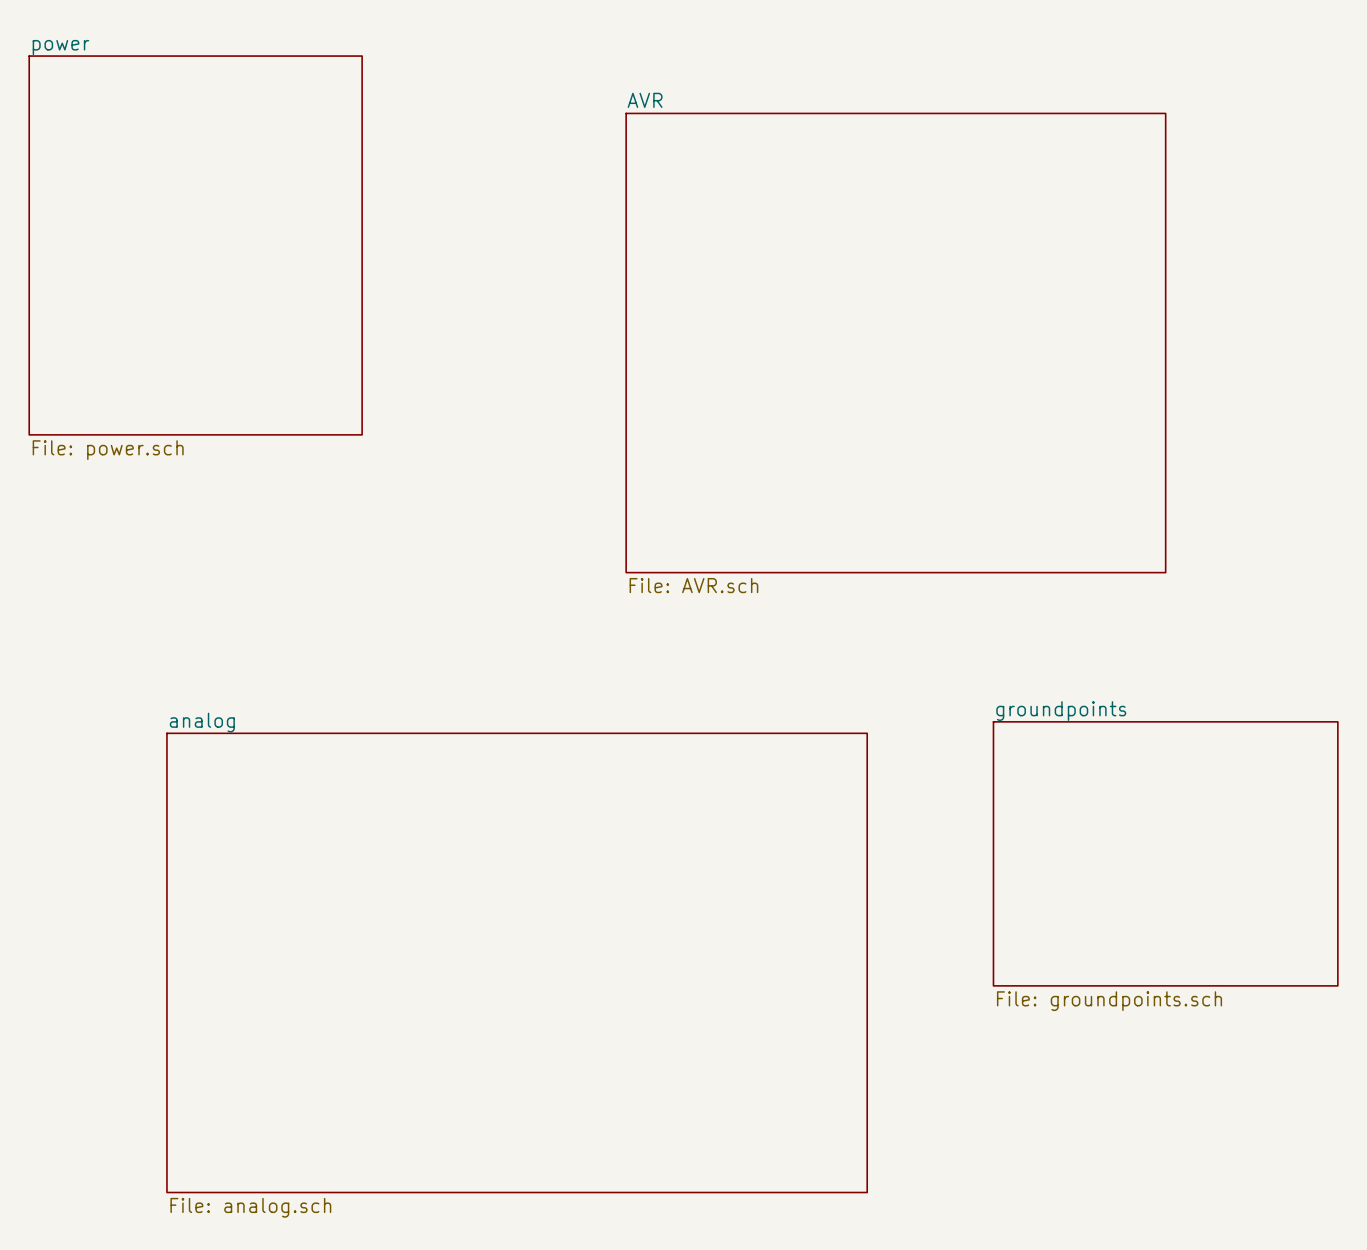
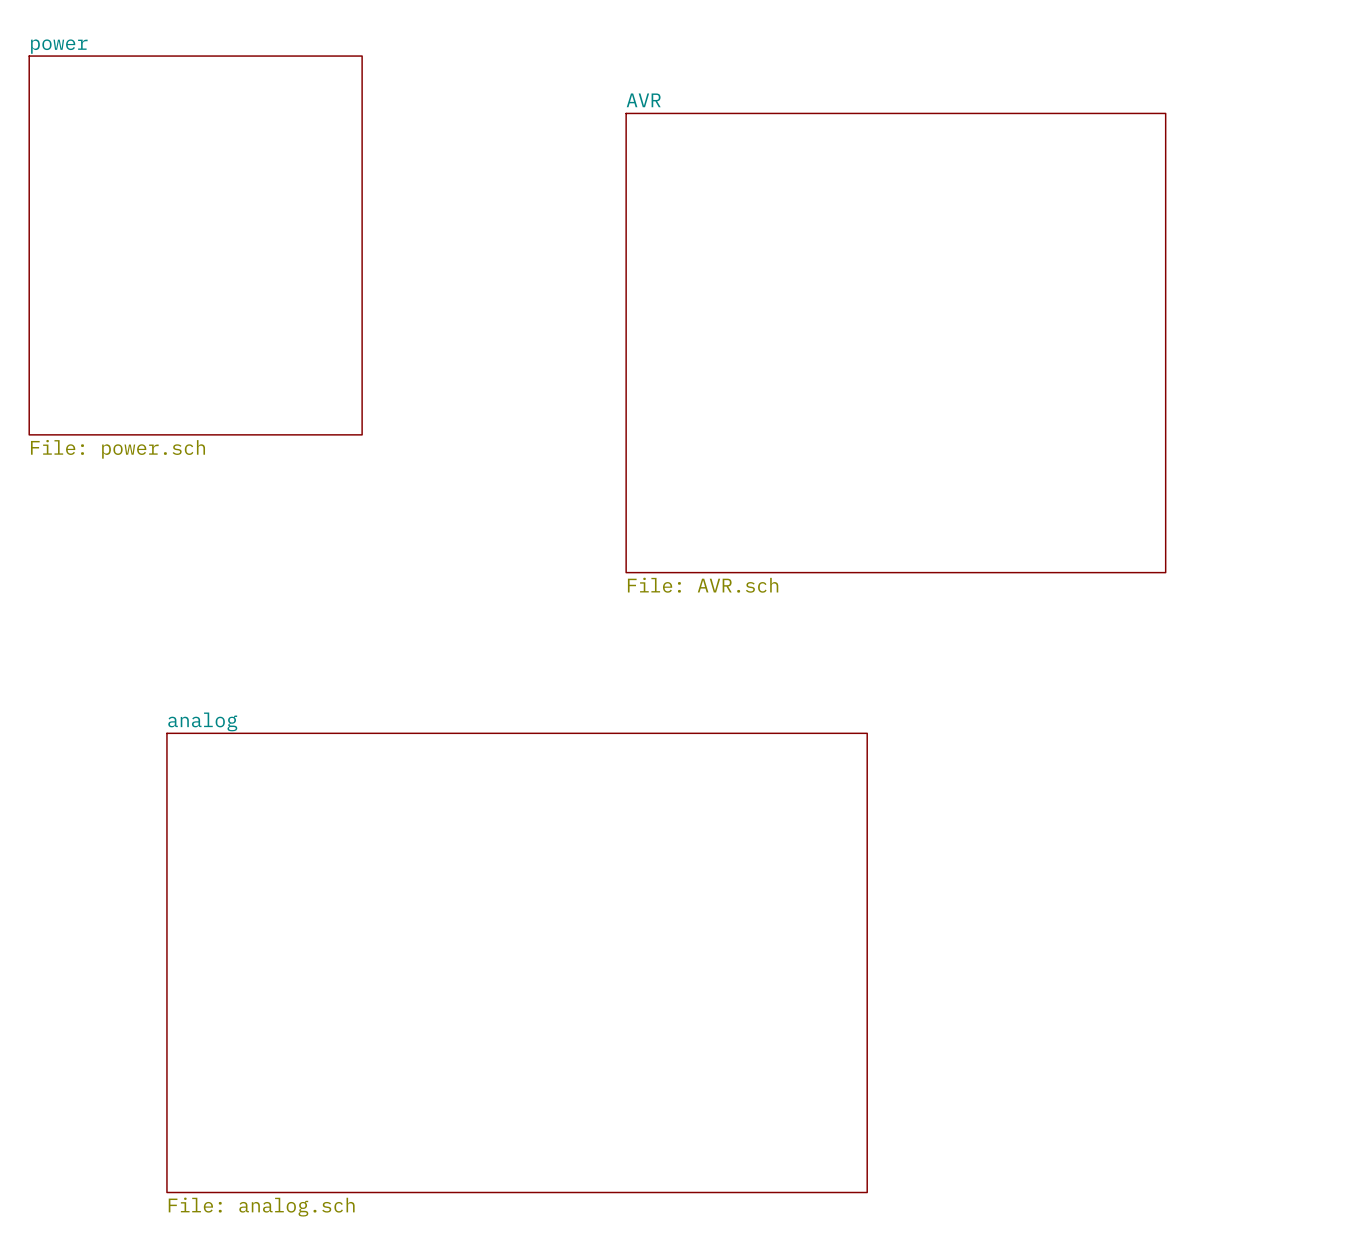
sheet groundpoints: File: groundpoints.sch (1165, 853) -> none

